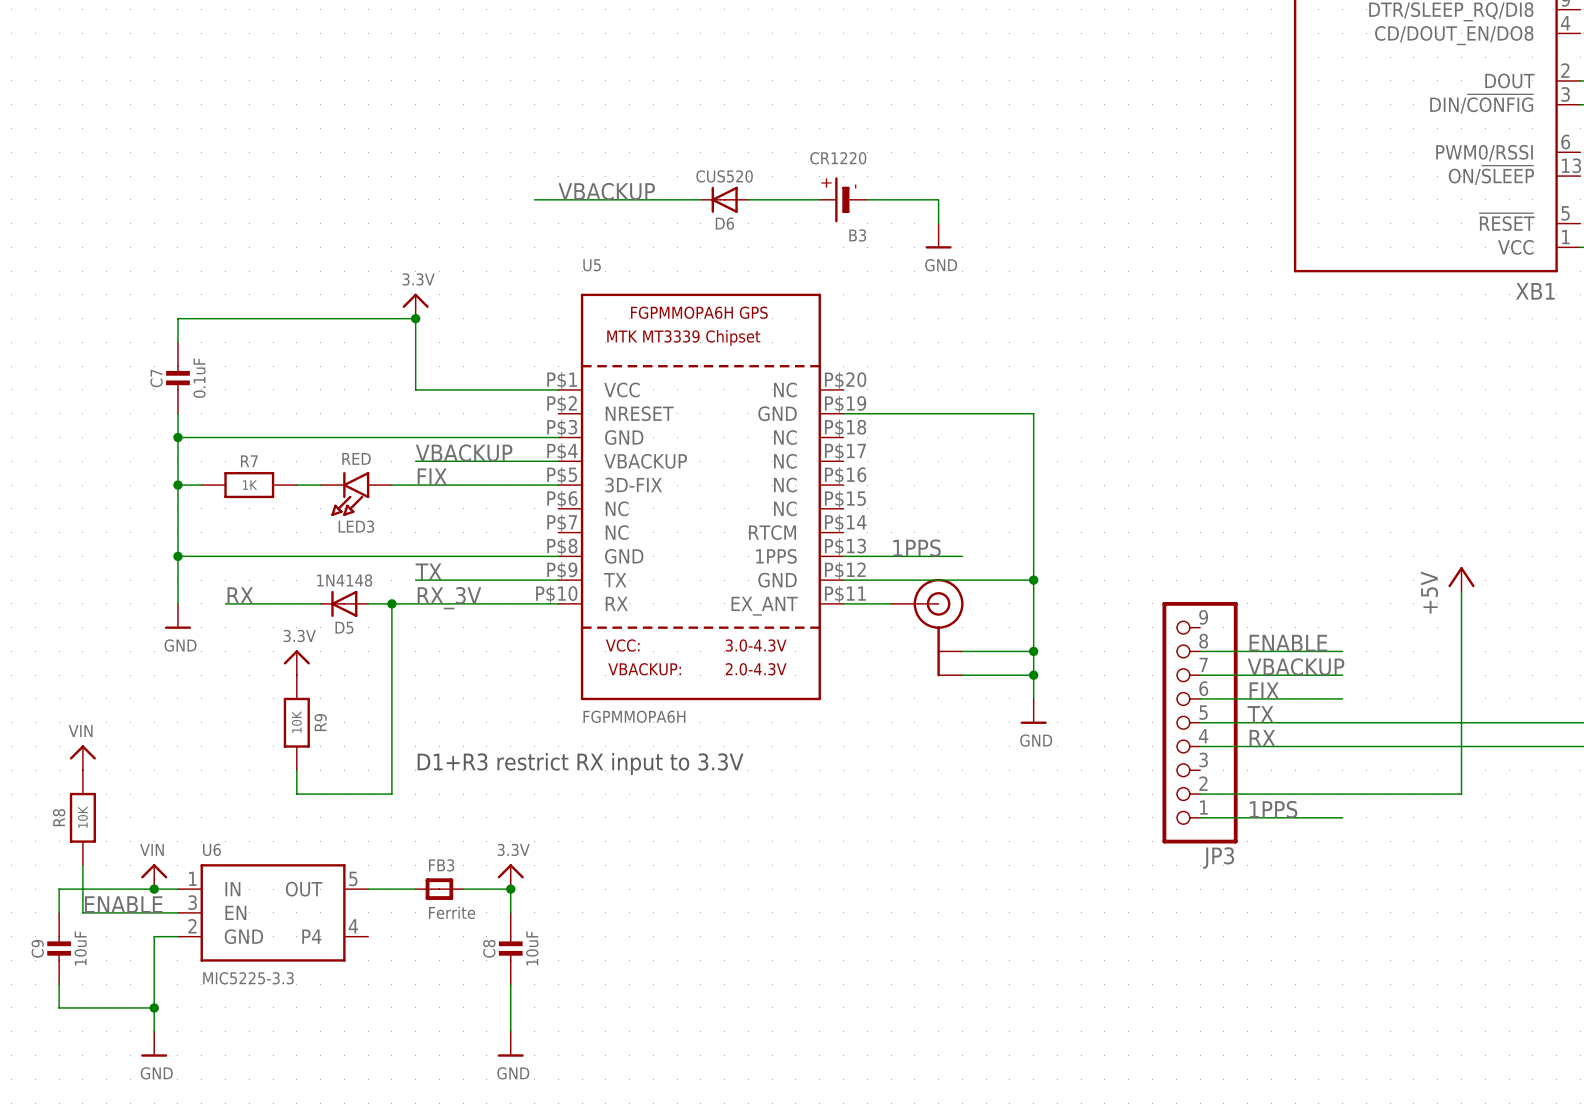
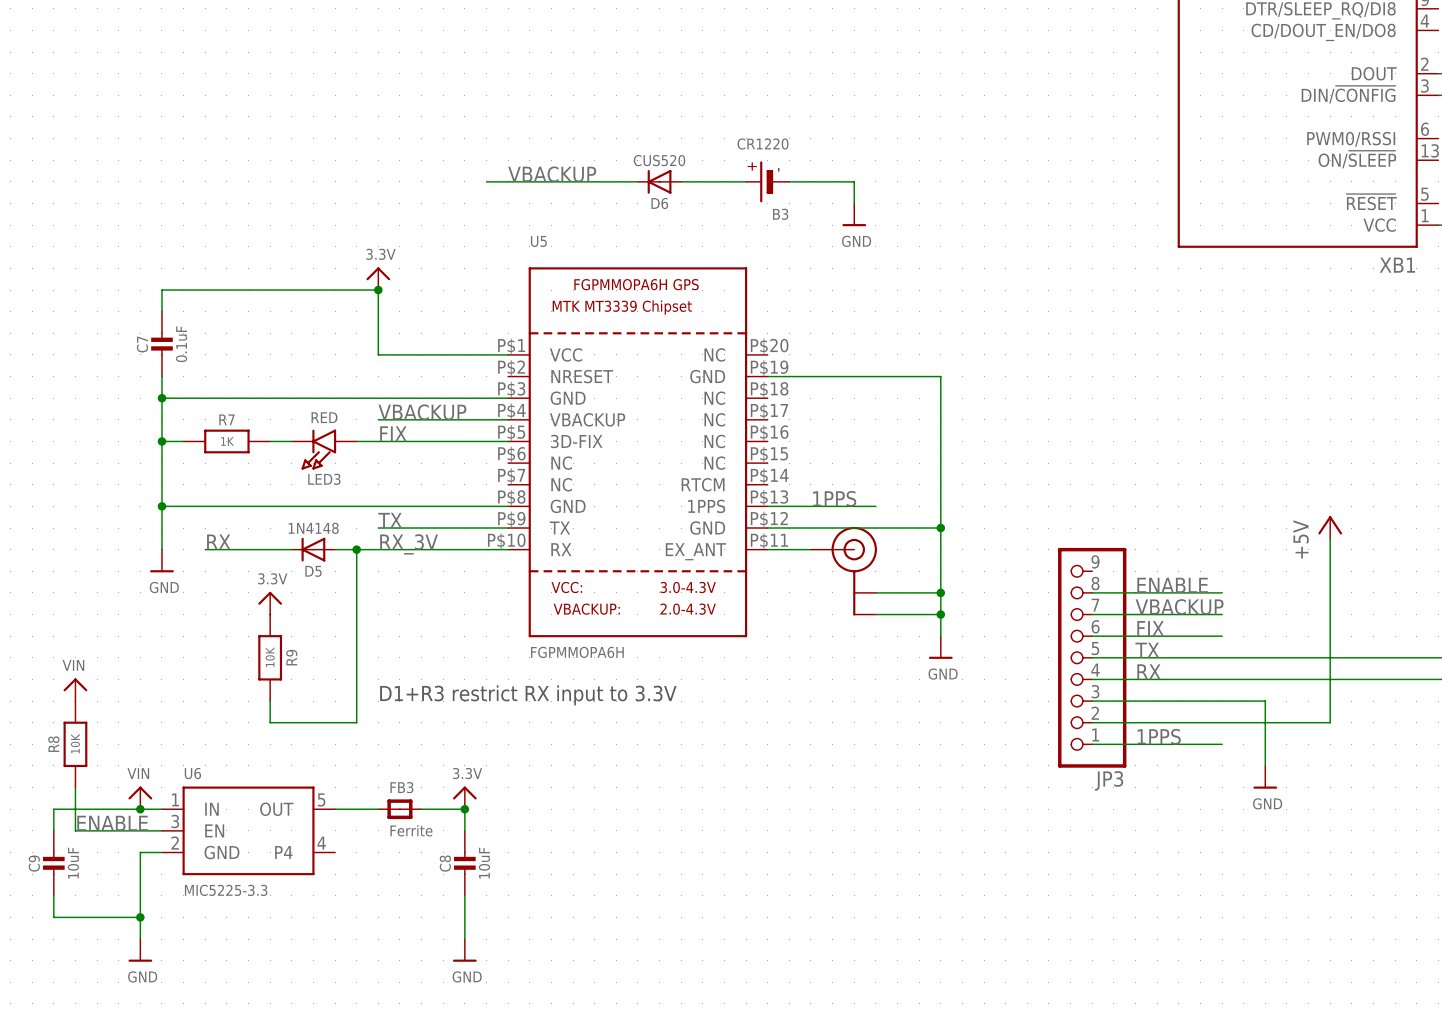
wire: none -> (1092, 701) (1265, 701) (1265, 765)
power symbol: none -> GND (1265, 777)

